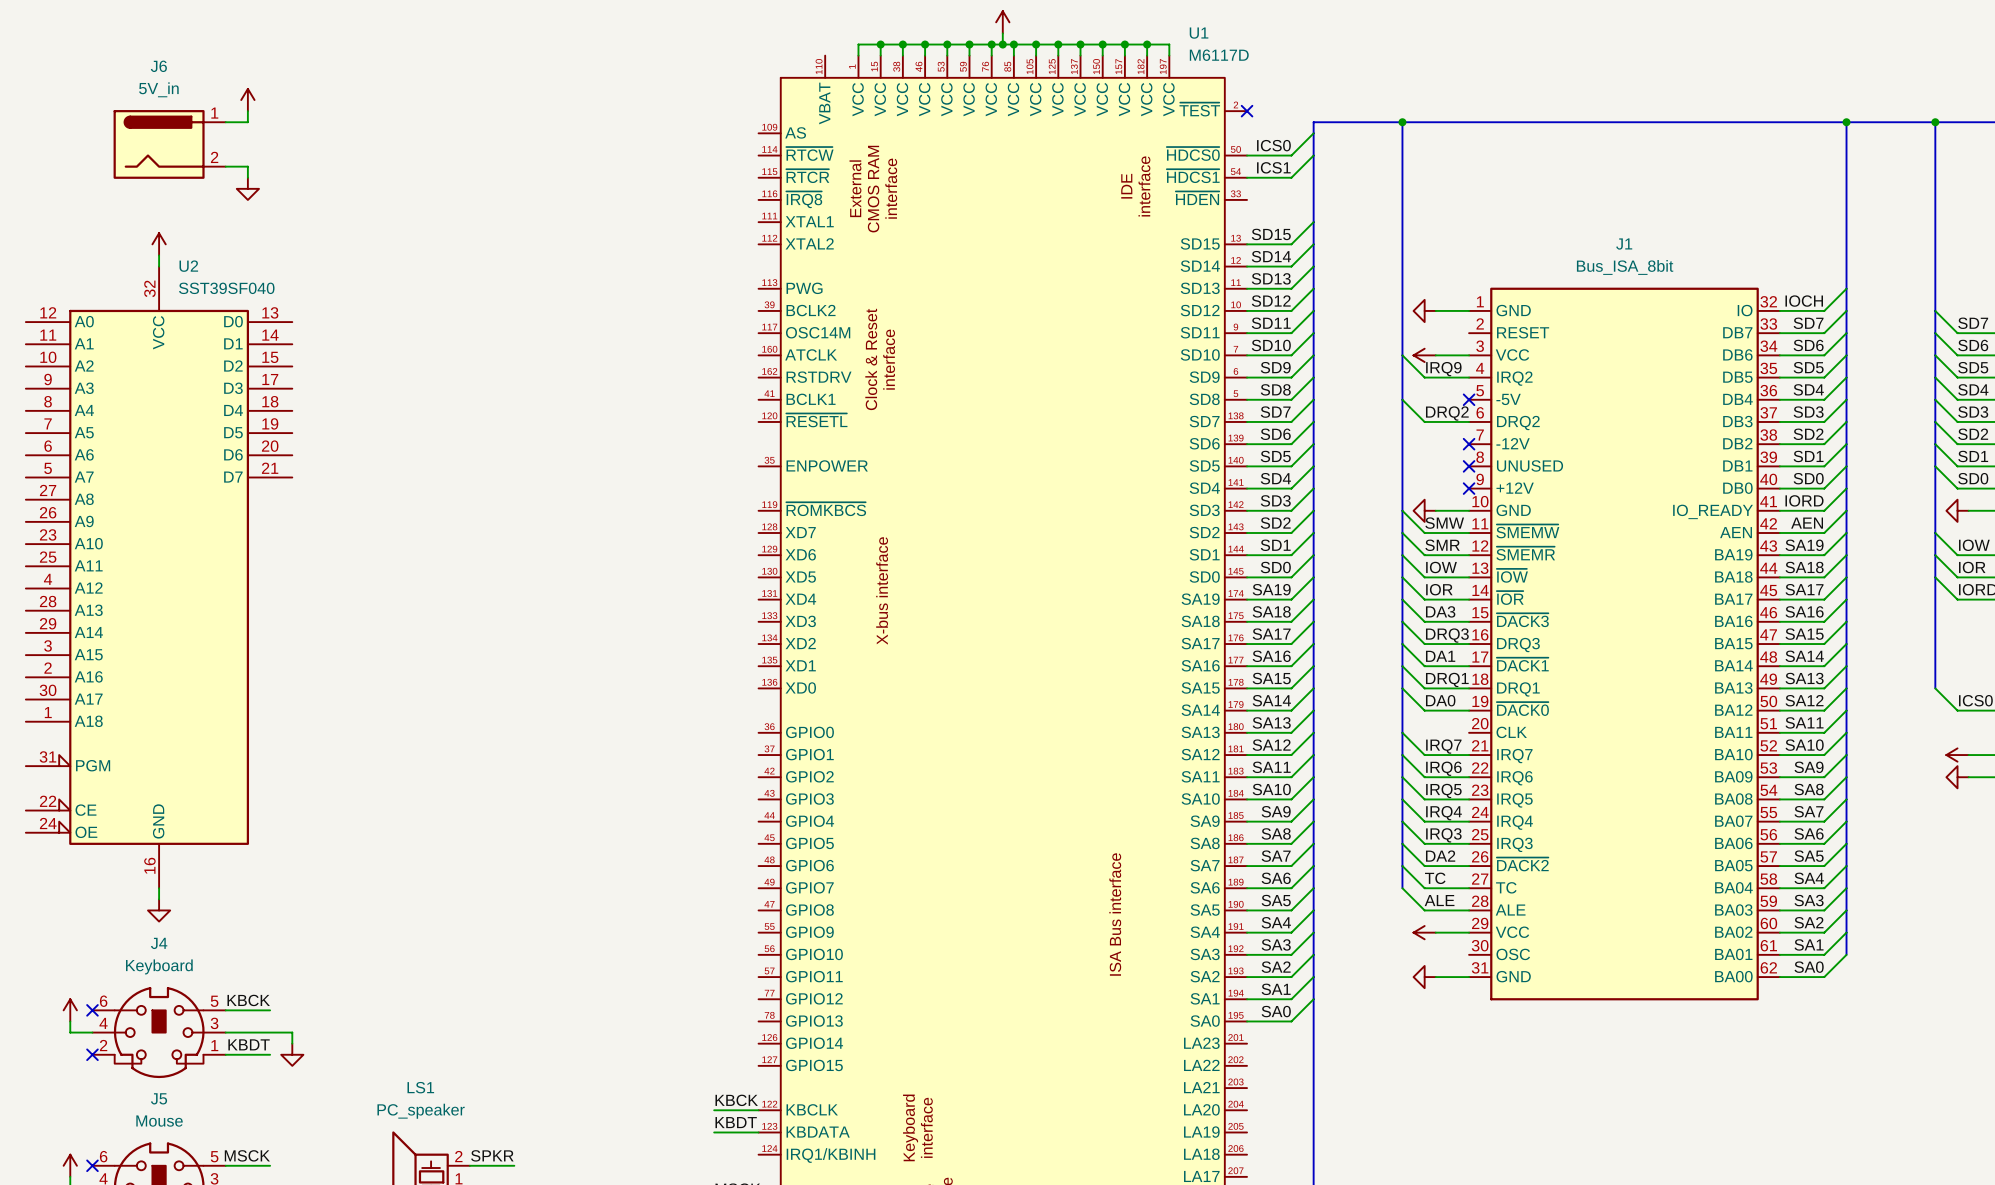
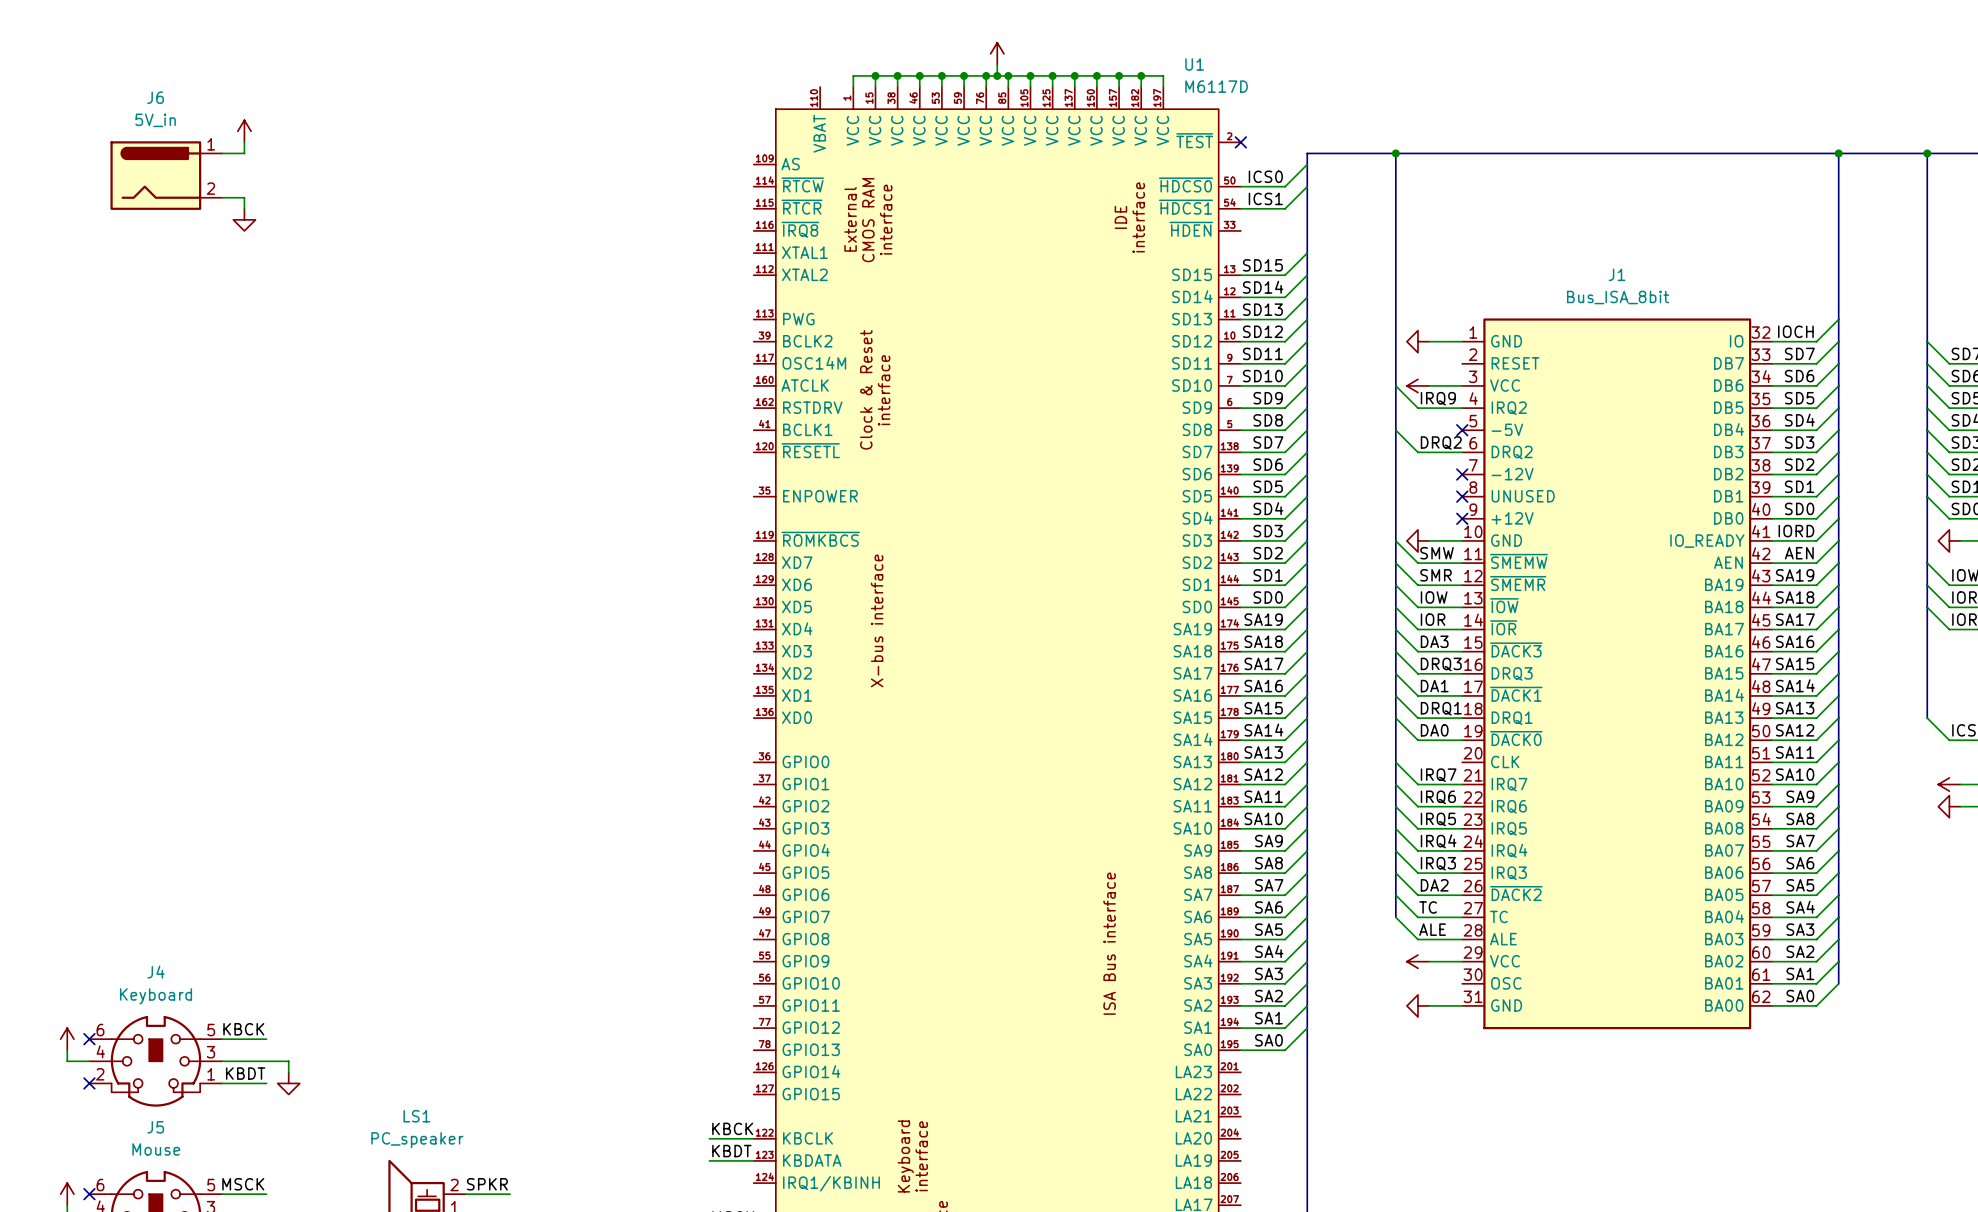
power symbol: (159, 244) -> none
wire: (159, 255) (159, 266) -> none
U2: SST39SF040 (159, 577) -> none
wire: (159, 888) (159, 899) -> none
power symbol: (159, 910) -> none

